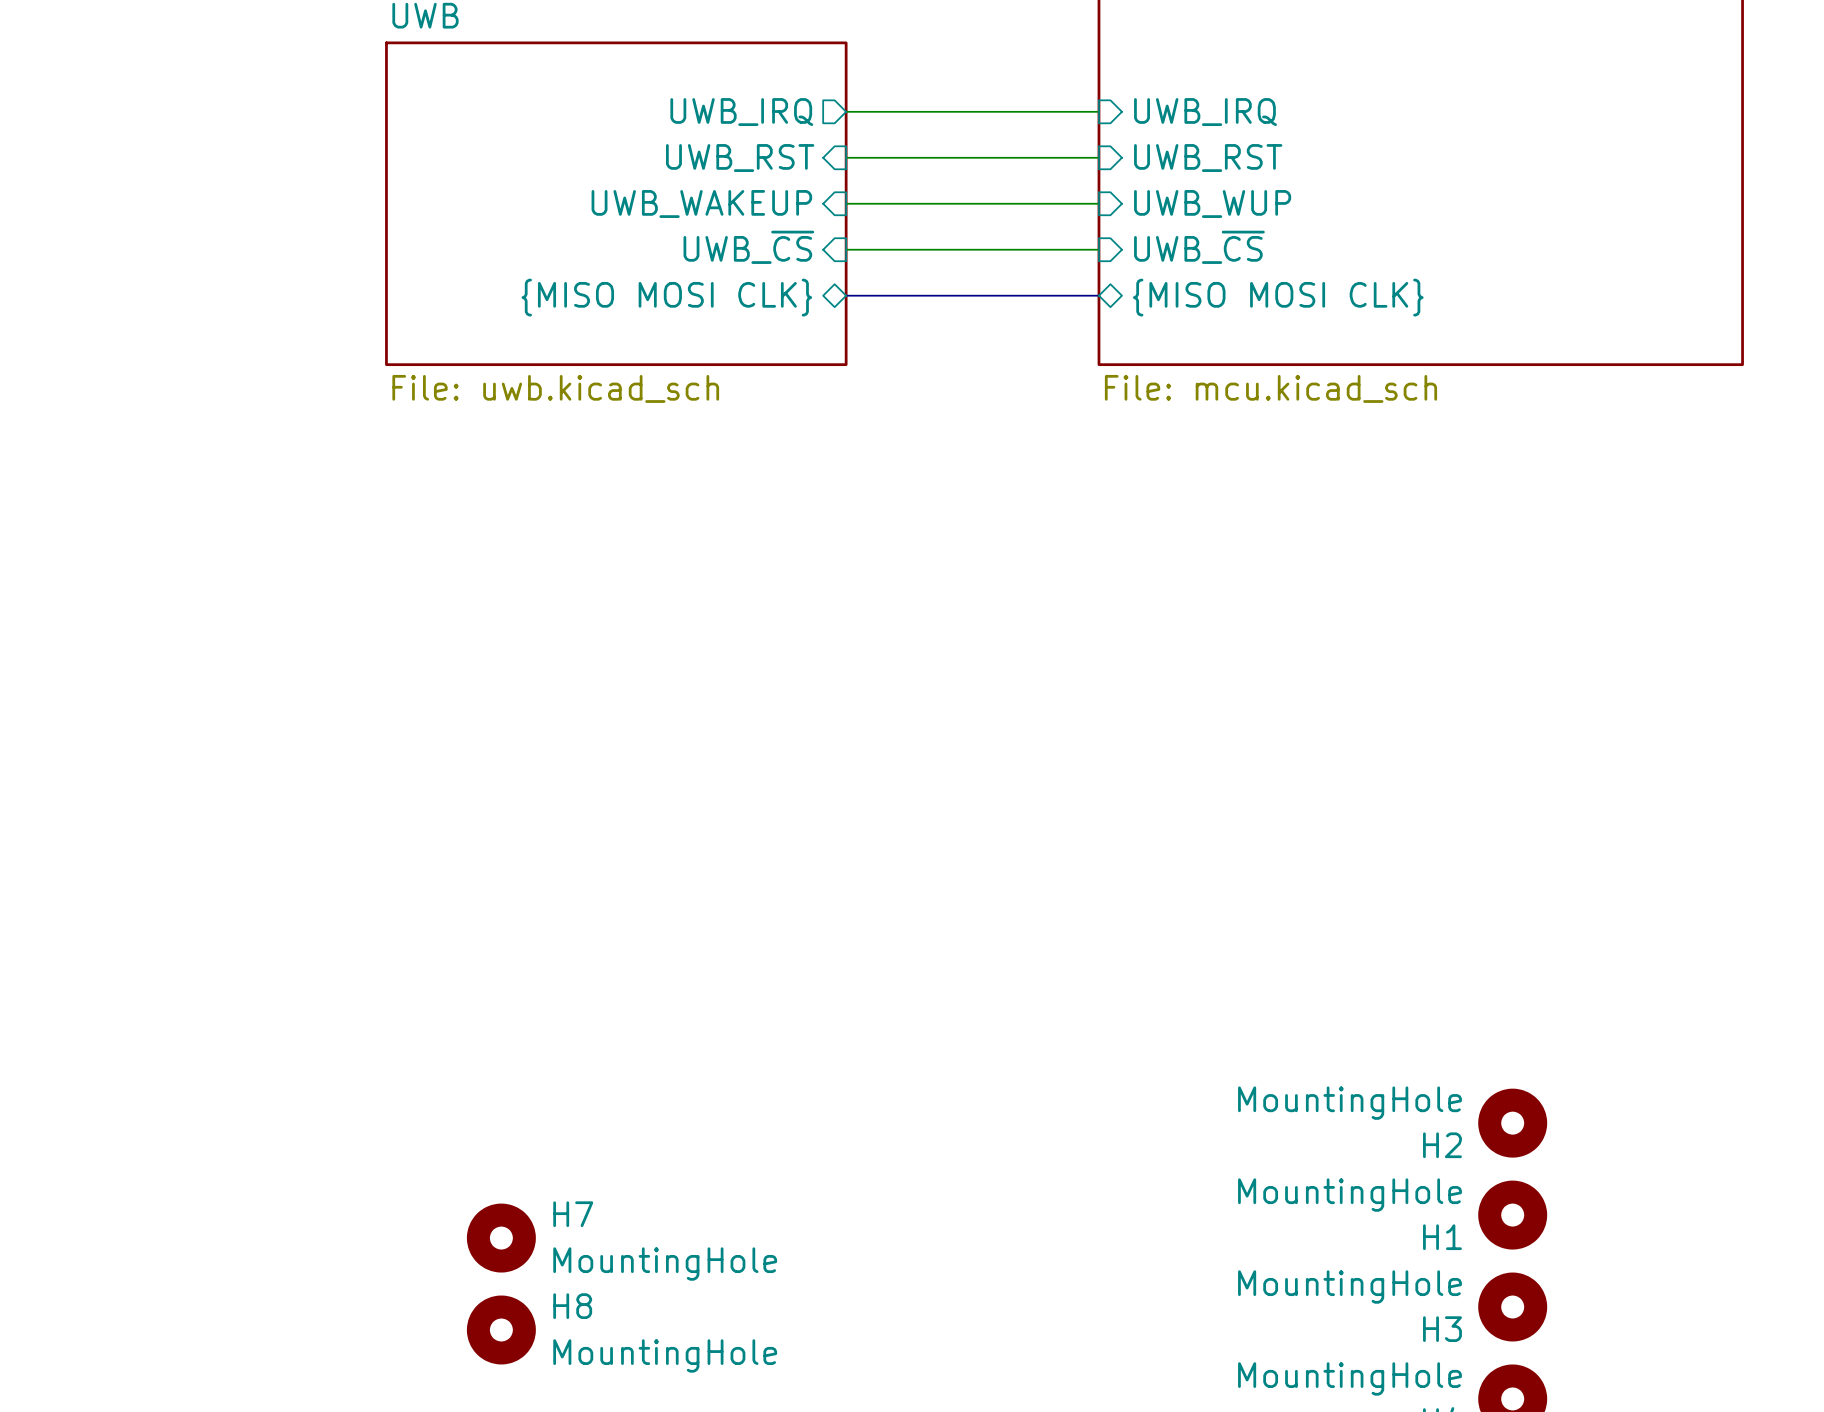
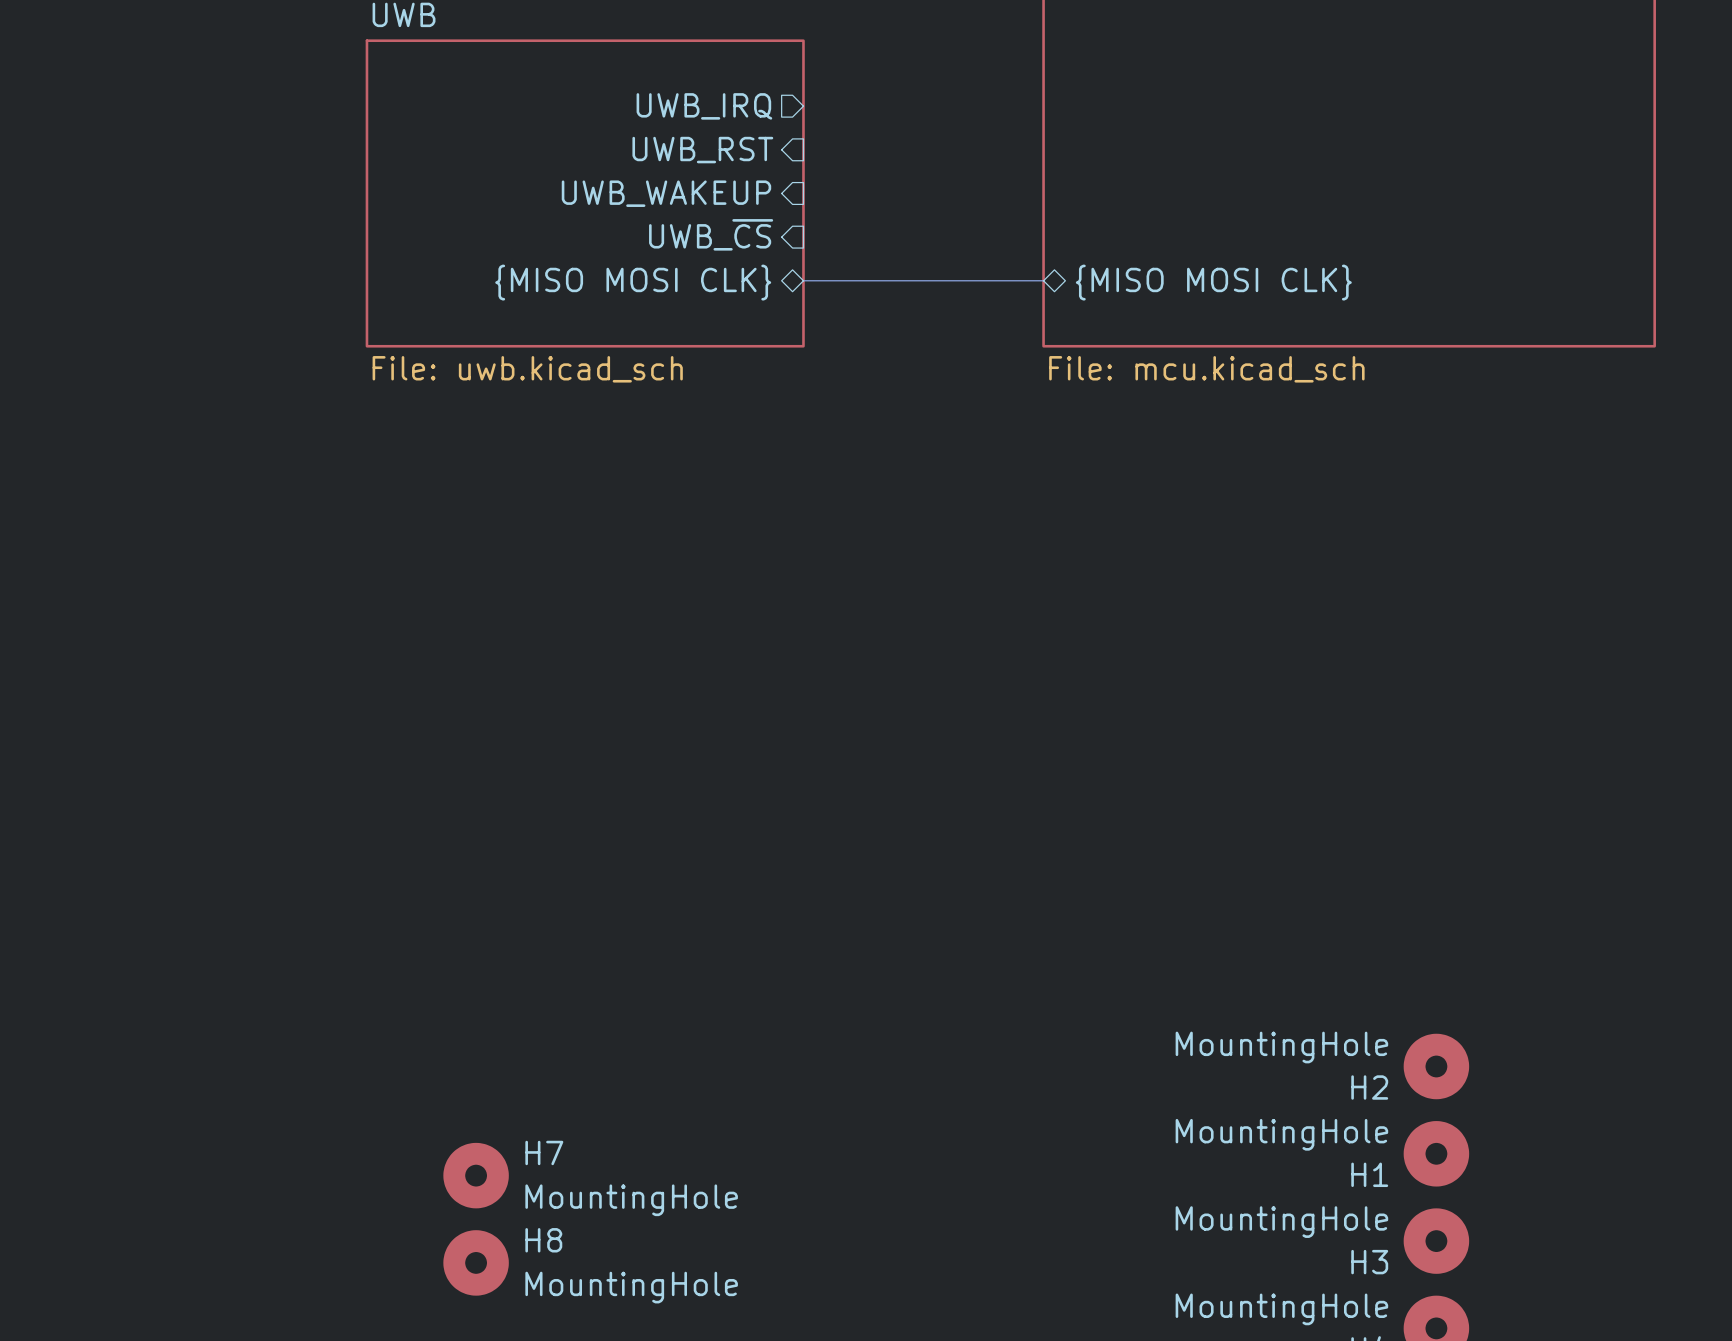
wire: (846, 111) (1098, 111) -> none
sheet pin: UWB_IRQ (1205, 112) -> none
wire: (846, 157) (1098, 157) -> none
sheet pin: UWB_RST (1208, 158) -> none
wire: (846, 203) (1098, 203) -> none
sheet pin: UWB_WUP (1212, 203) -> none
sheet pin: UWB_~{CS} (1199, 247) -> none
wire: (846, 249) (1098, 249) -> none

